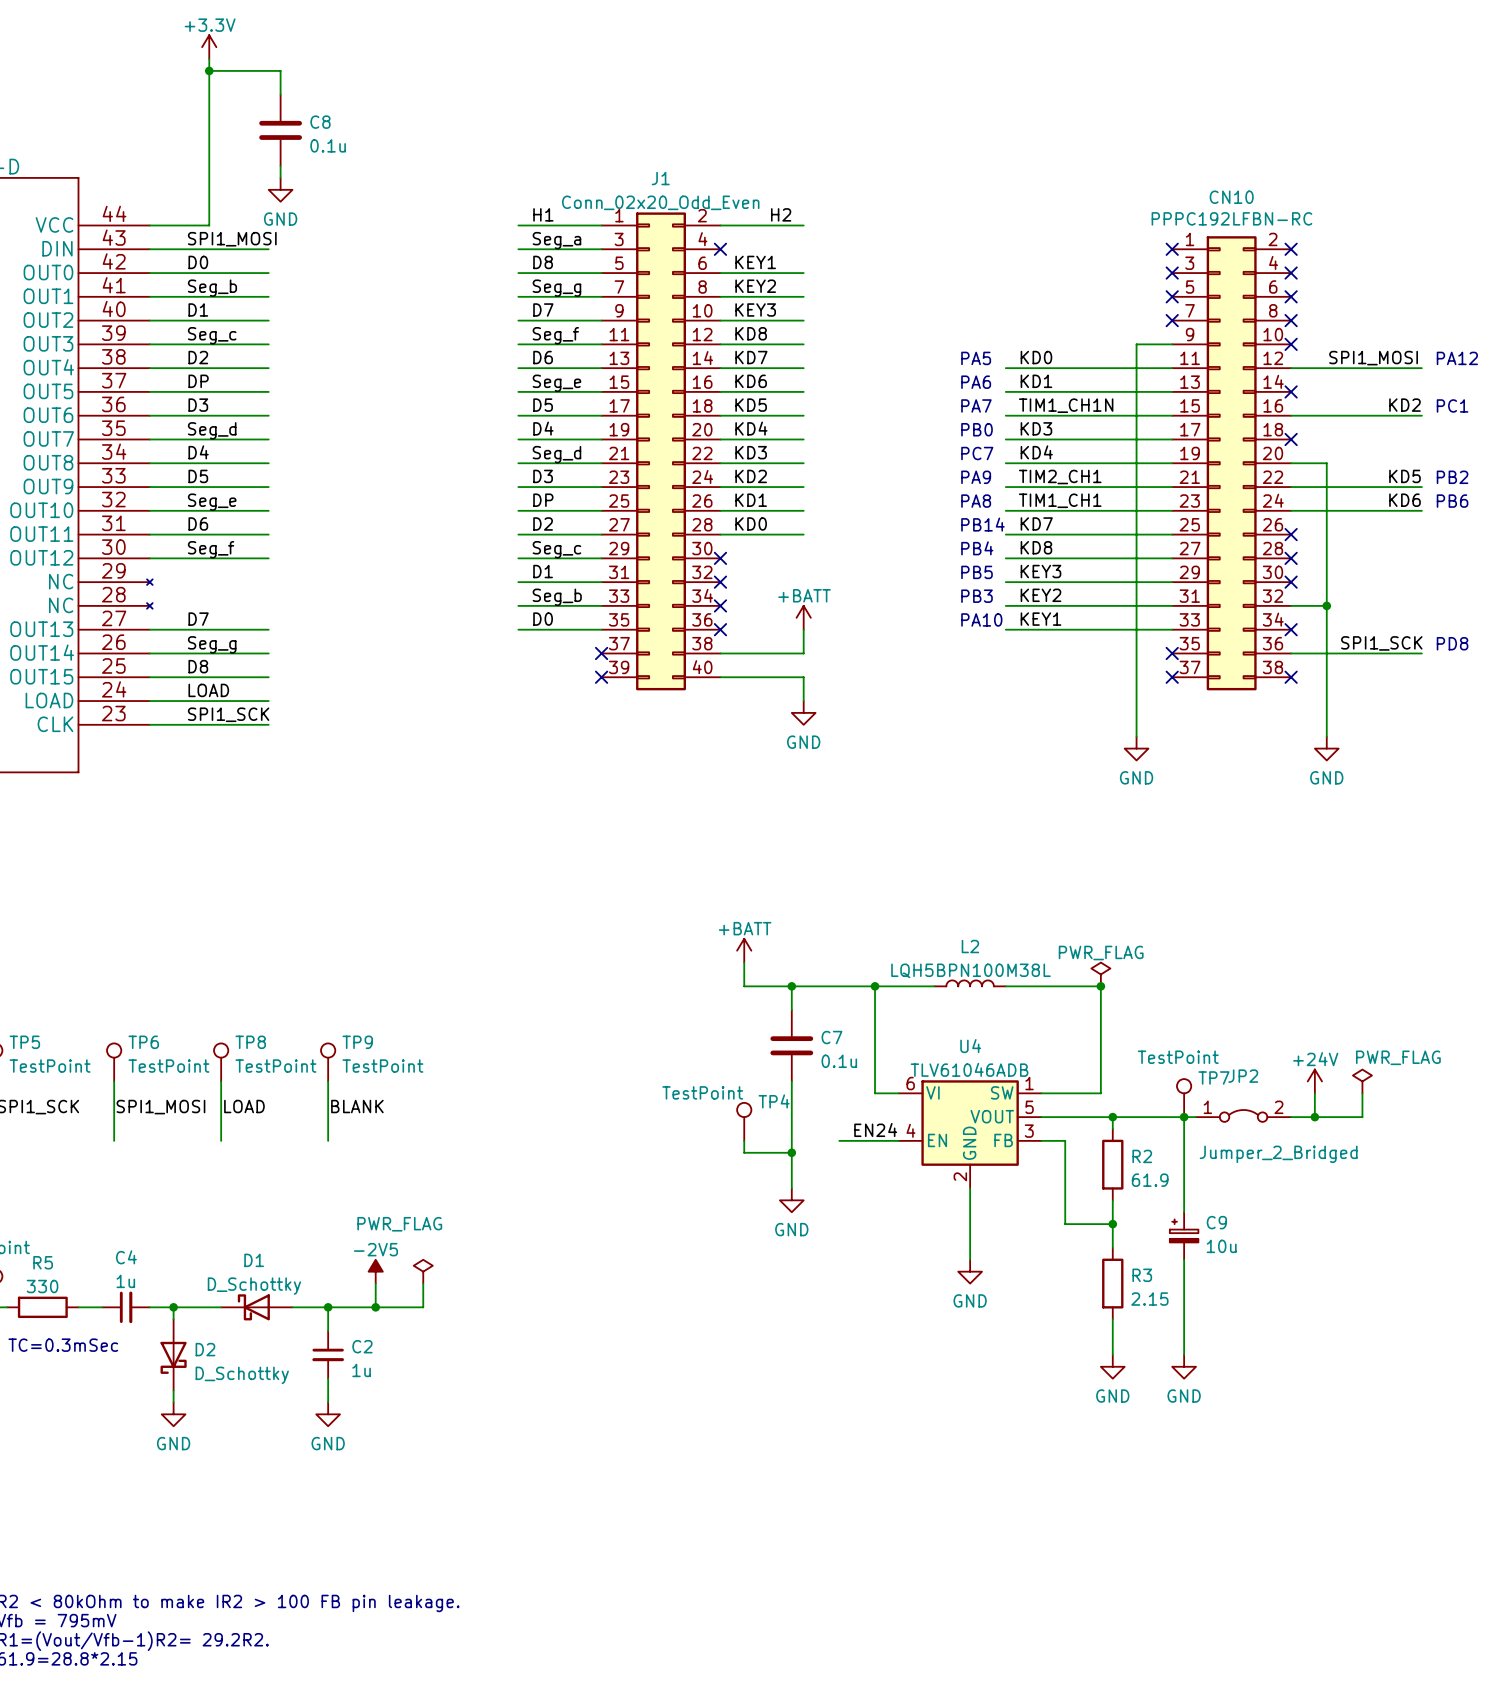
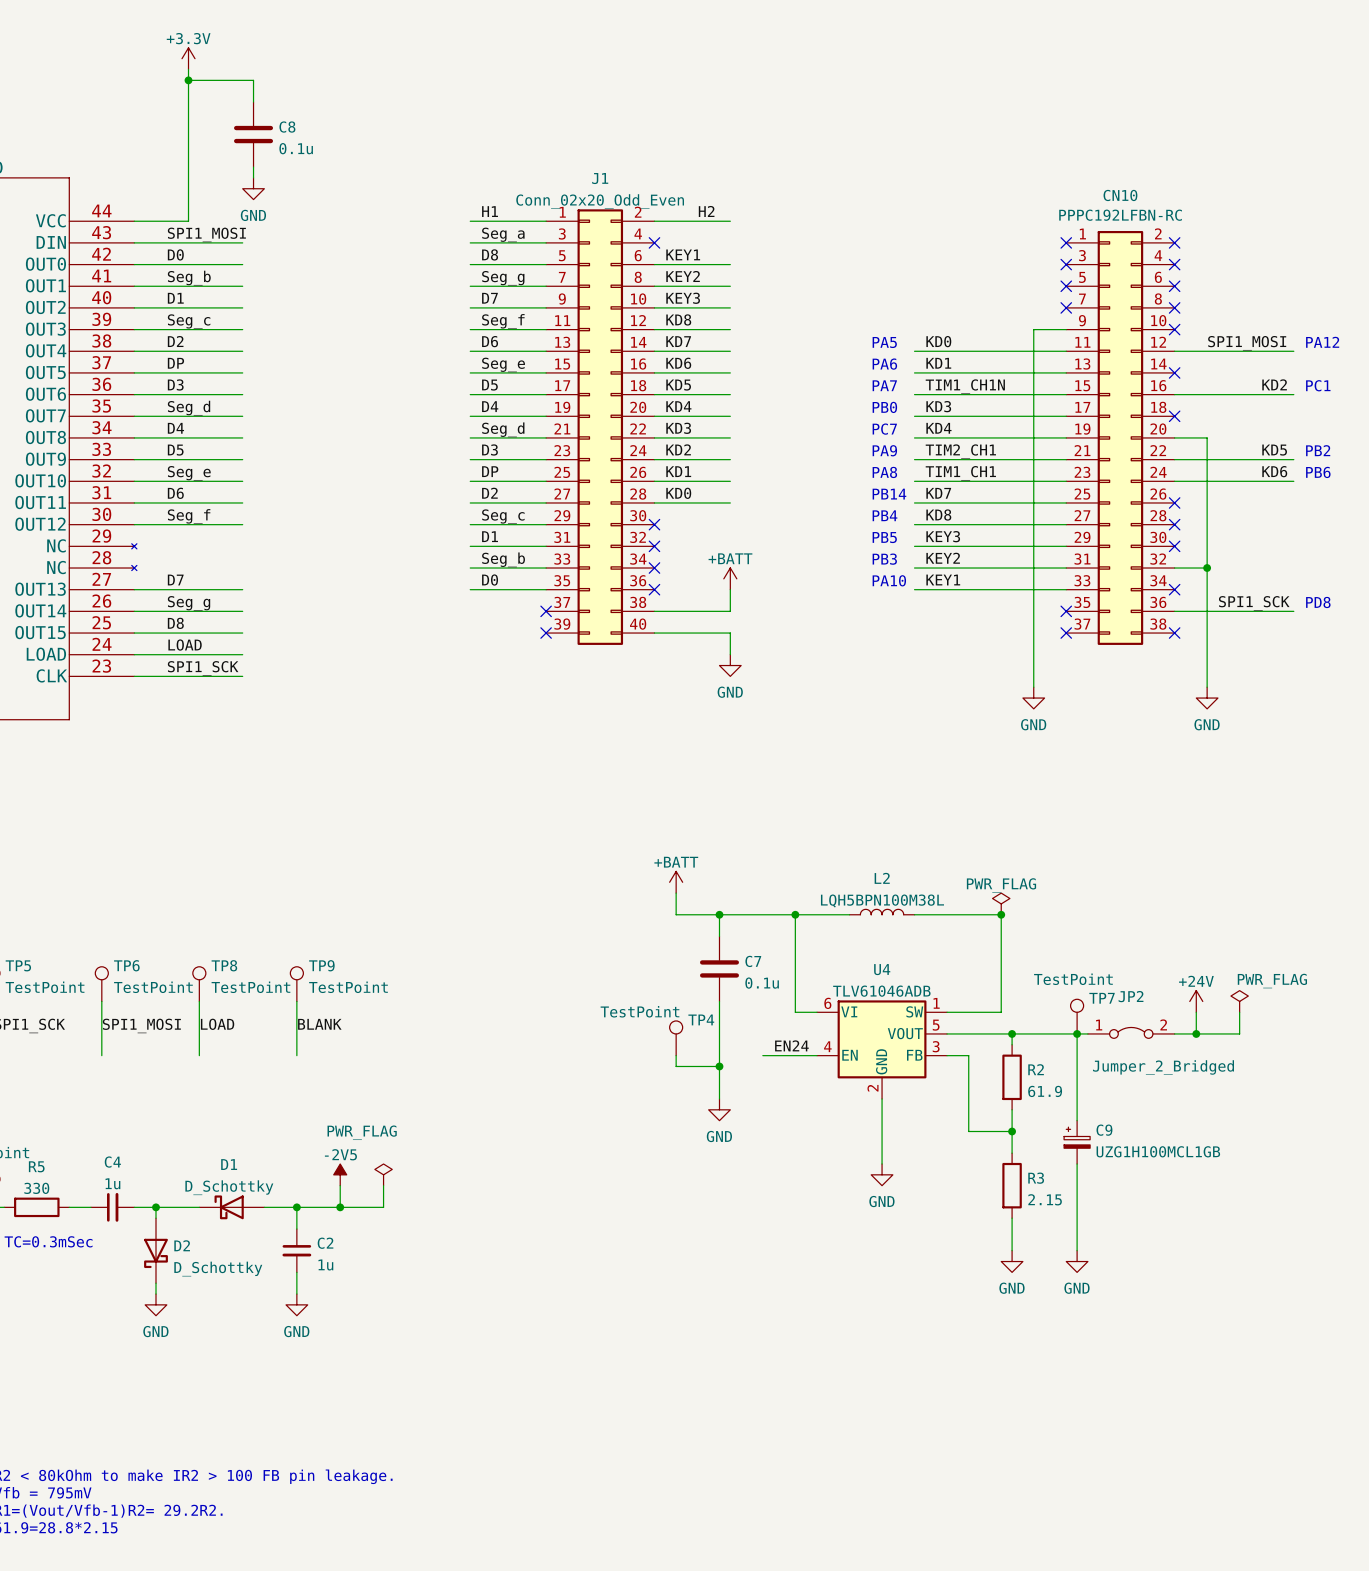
C9 value: 10u (1221, 1246) -> UZG1H100MCL1GB (1158, 1151)

